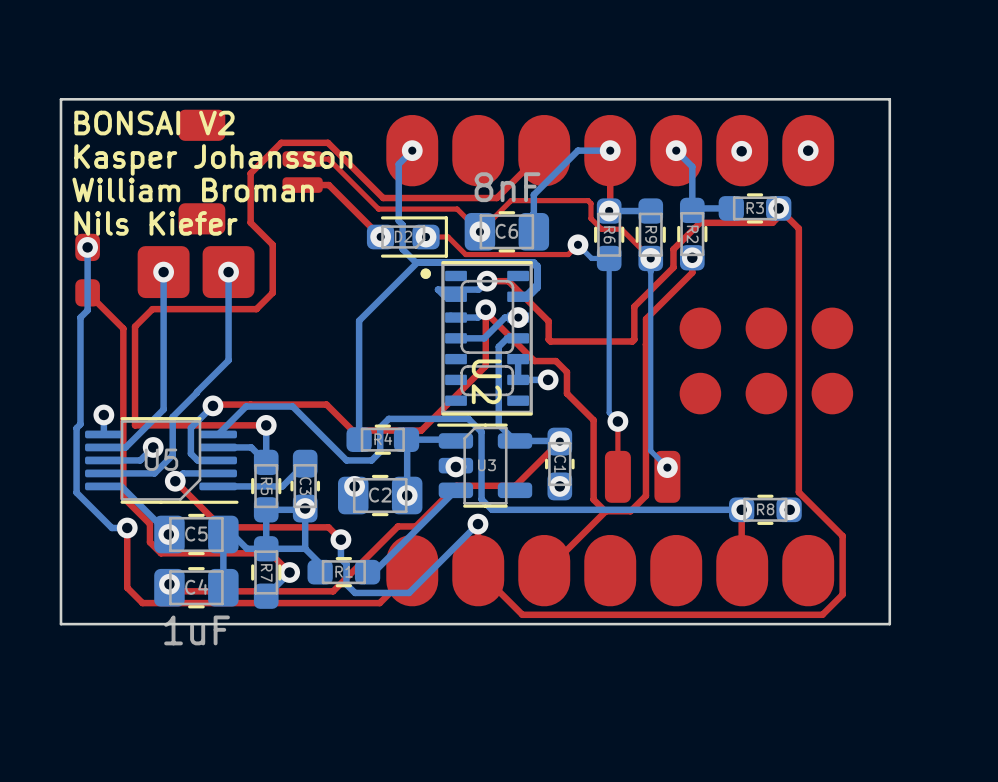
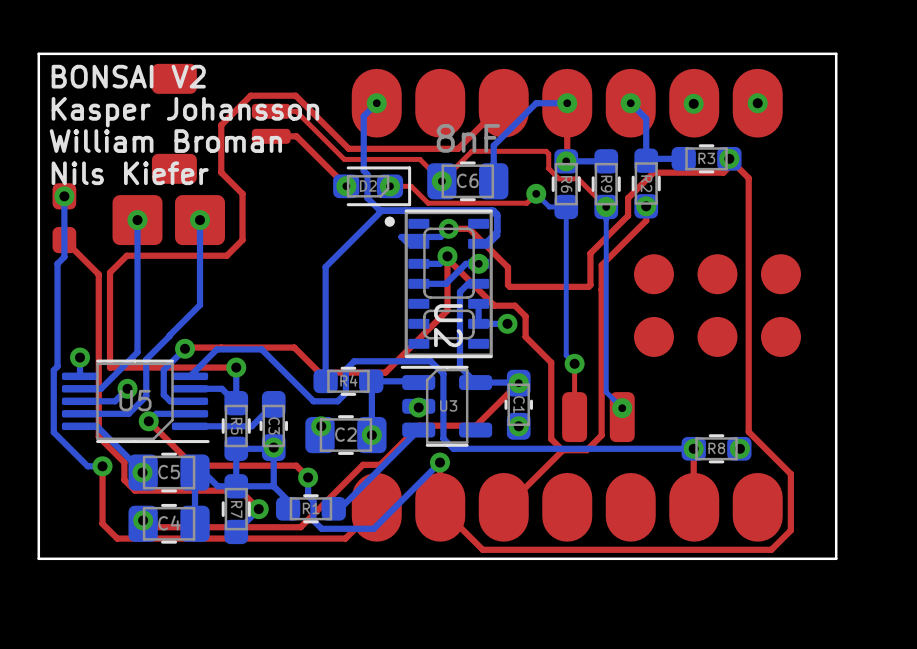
C4 value: 1uF (197, 630) -> none

